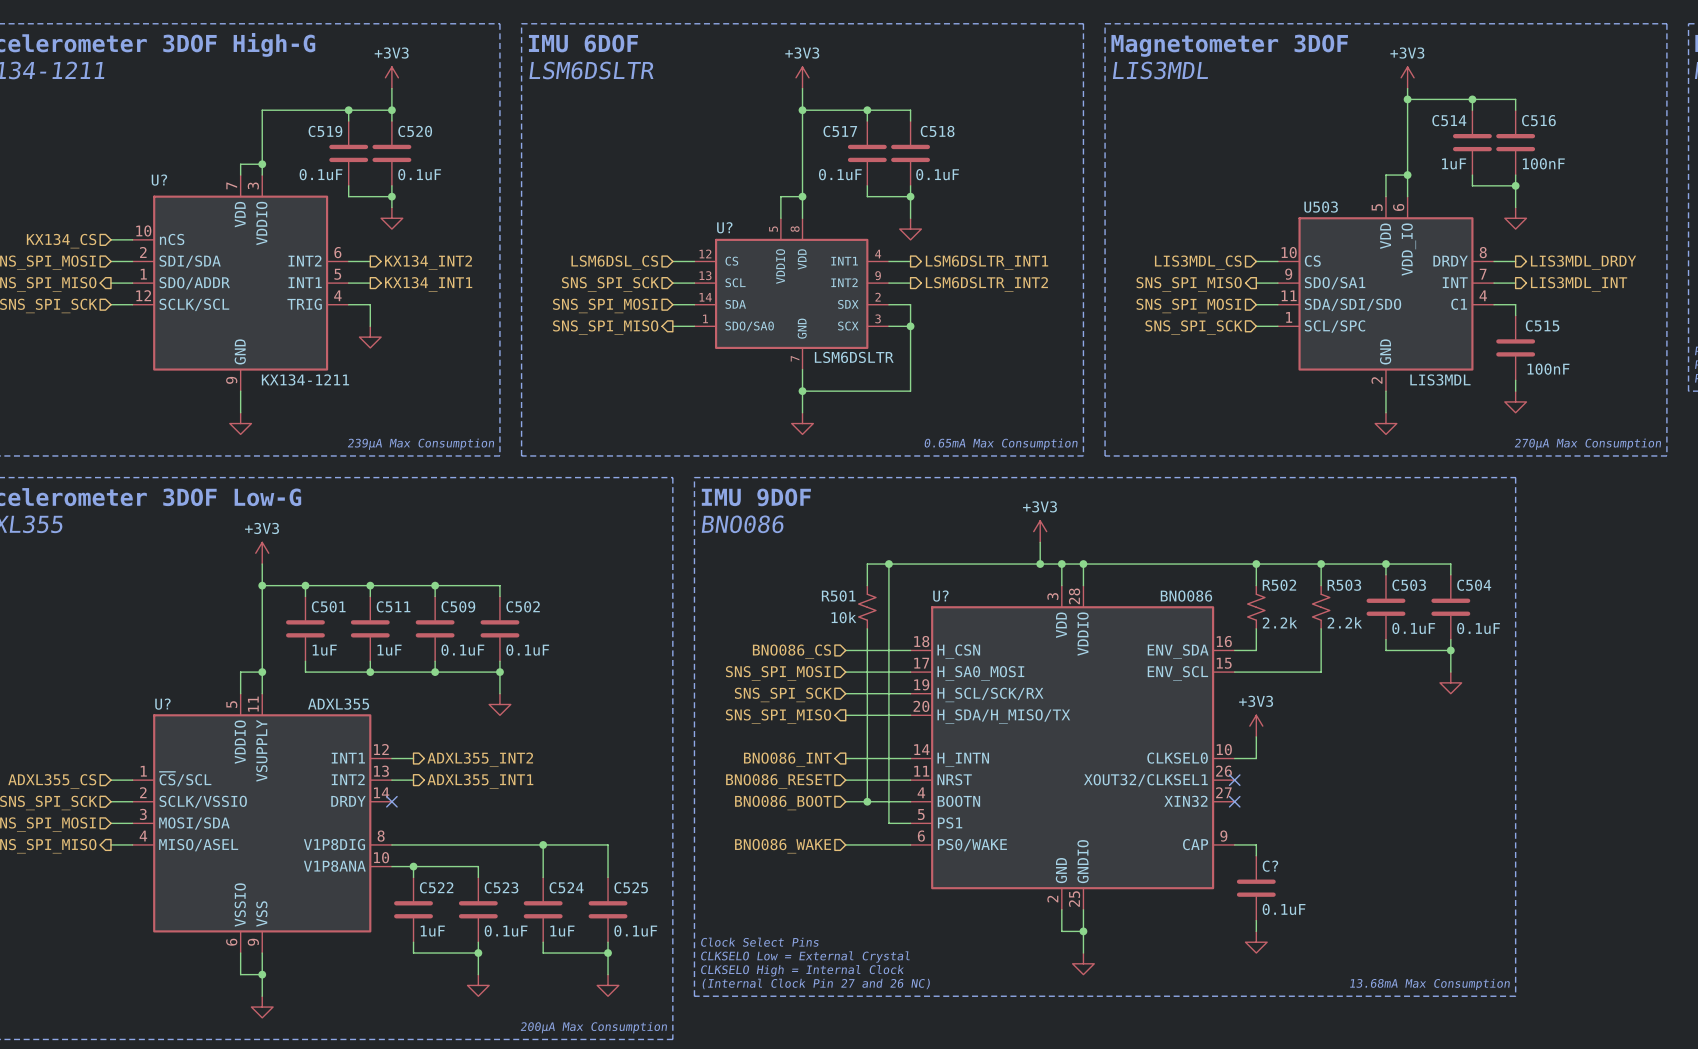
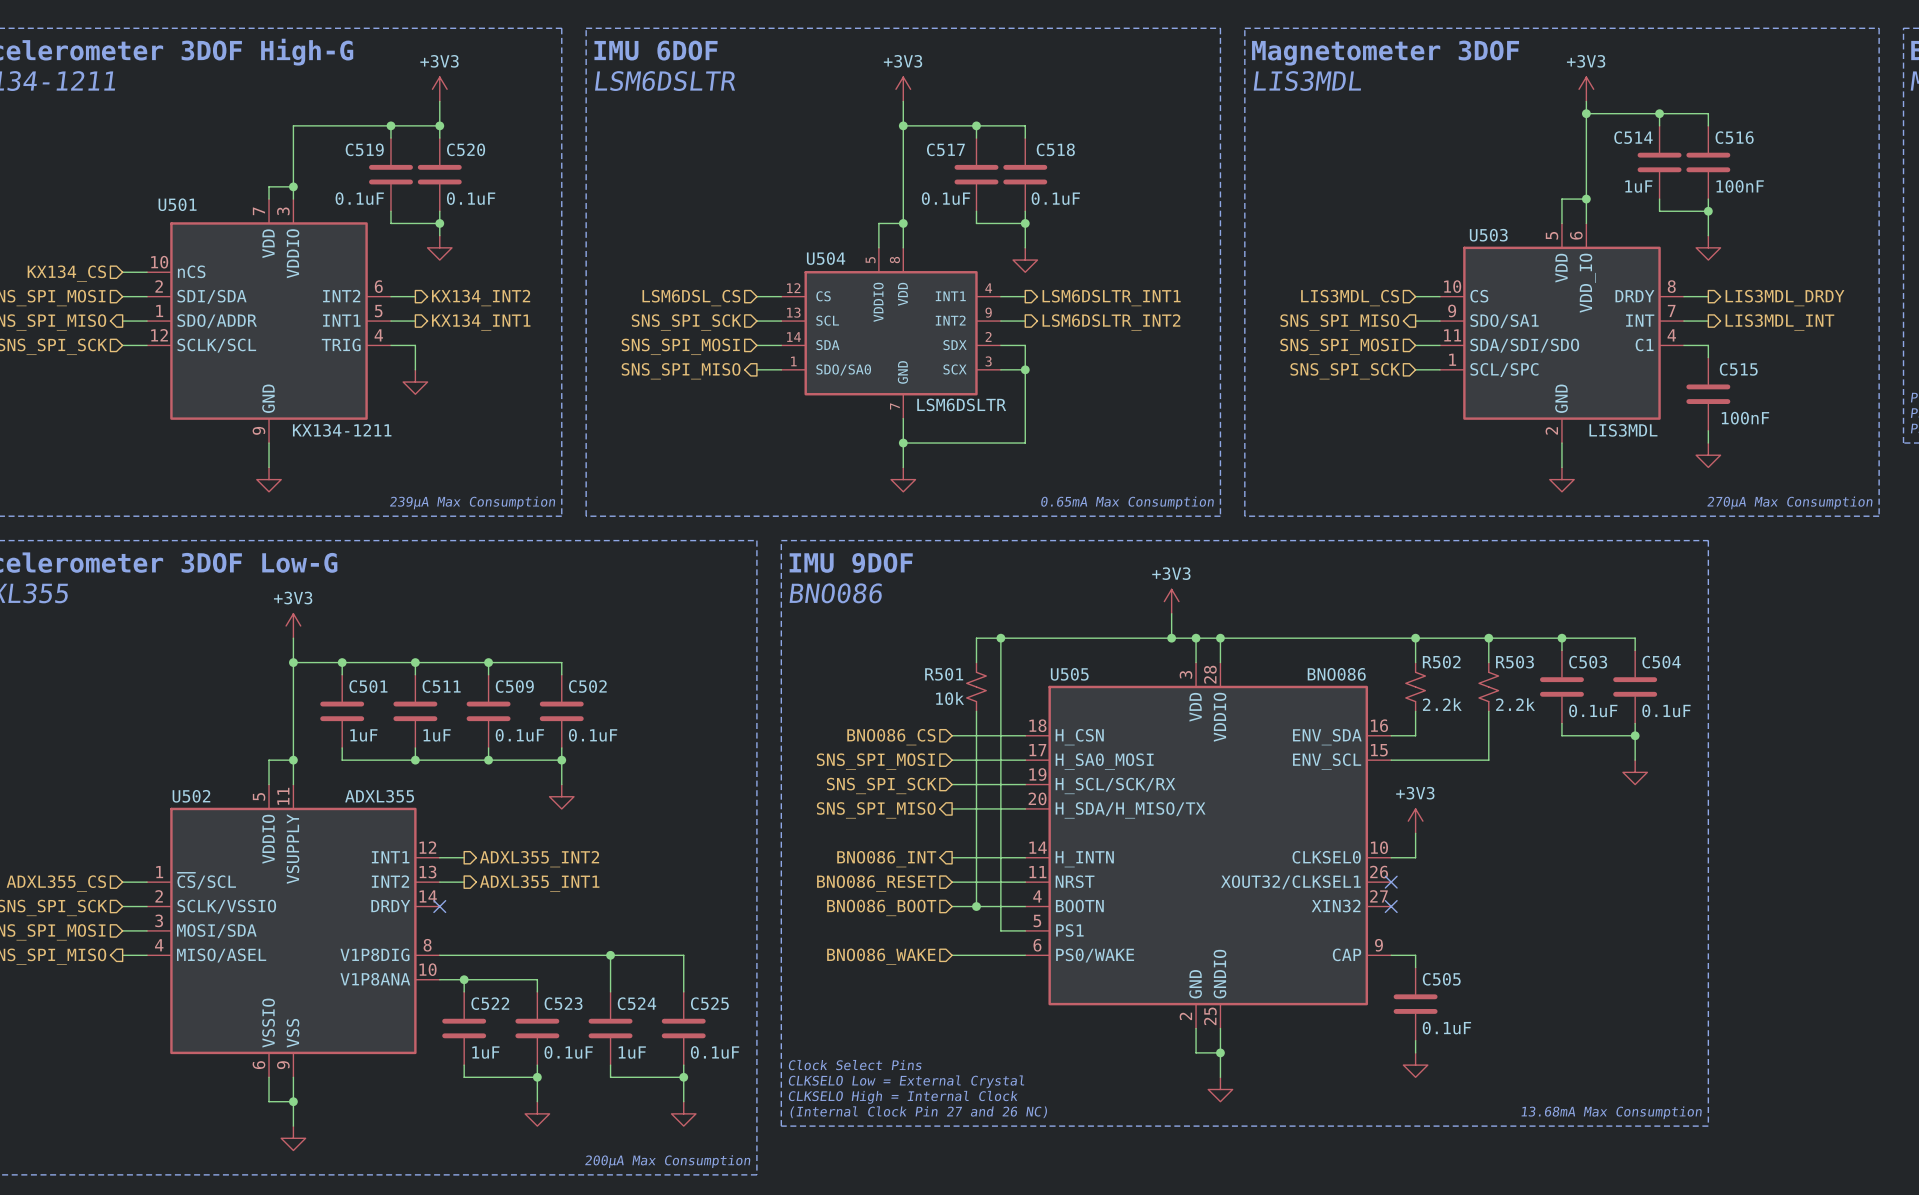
U? name: U? (159, 180) -> U501 (177, 204)
U? name: U? (724, 227) -> U504 (826, 258)
U? name: U? (940, 596) -> U505 (1069, 674)
U? name: U? (162, 704) -> U502 (191, 796)
C? name: C? (1270, 866) -> C505 (1441, 979)

